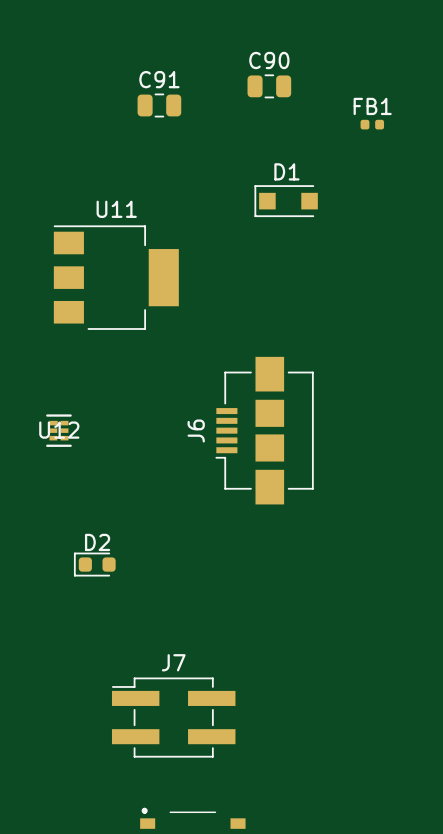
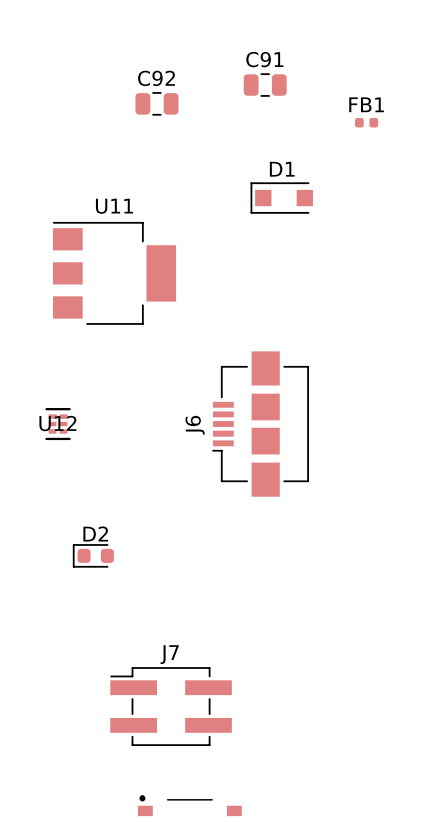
C90 name: C90 (269, 60) -> C91 (264, 59)
C91 name: C91 (159, 79) -> C92 (156, 78)

